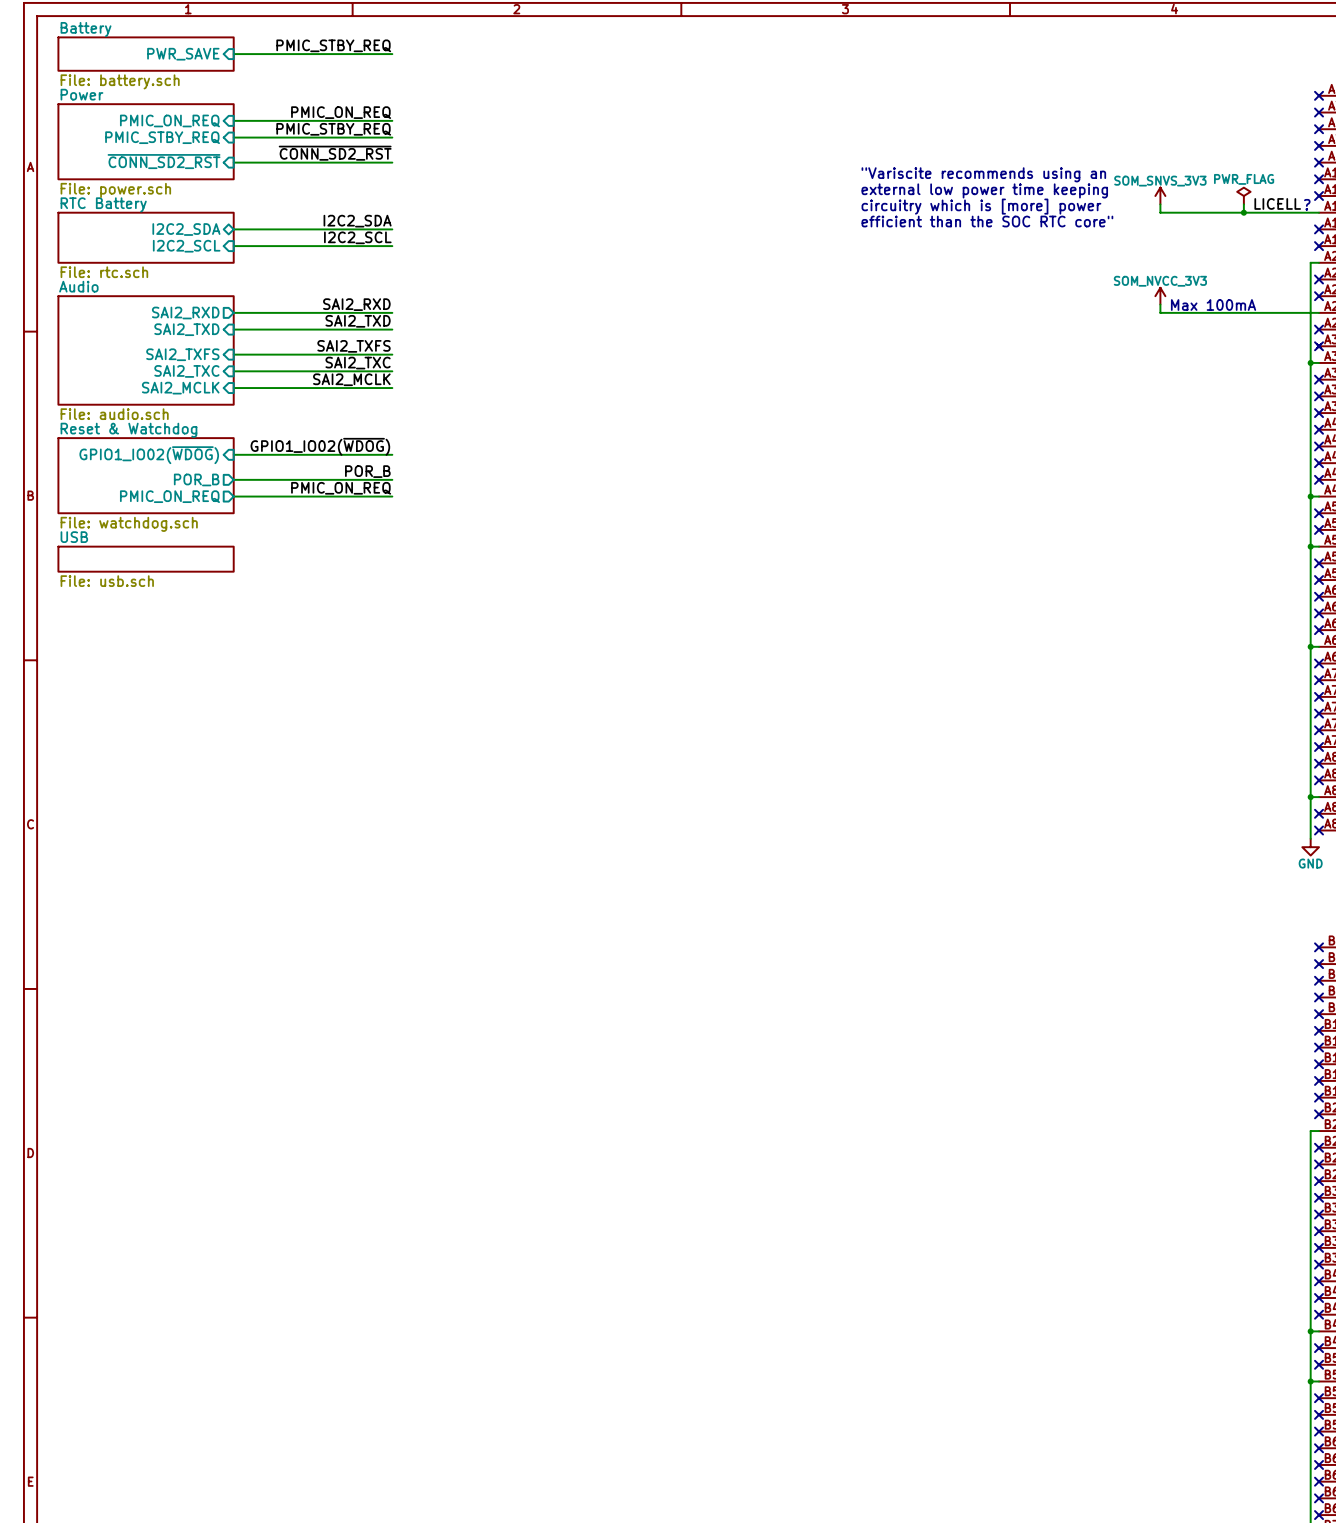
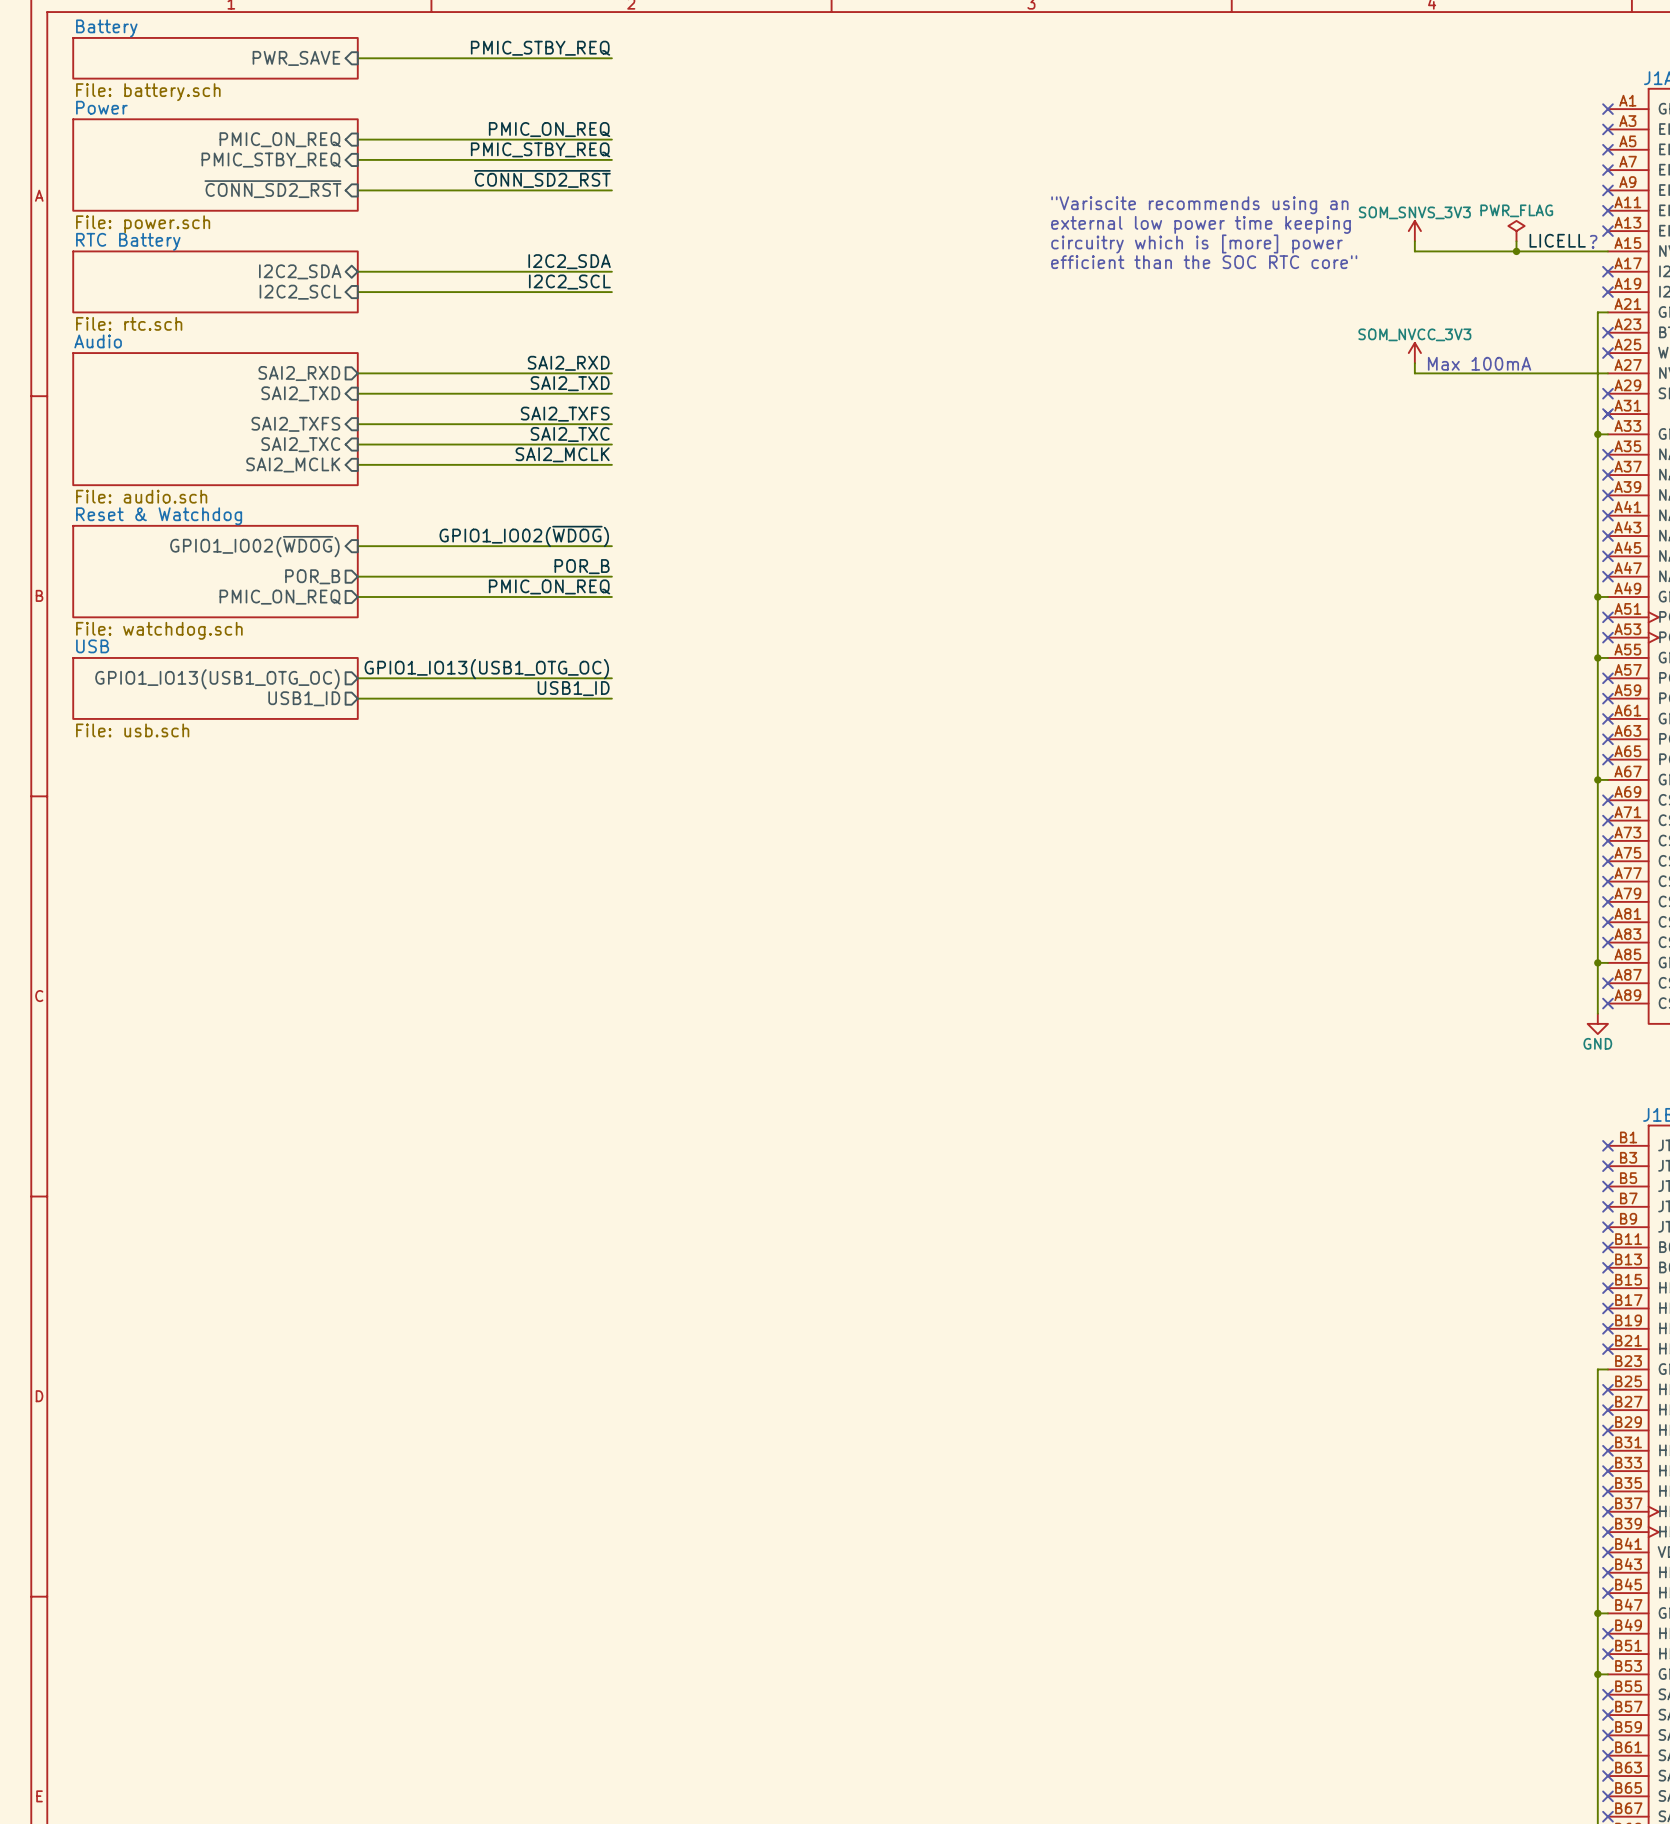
label position: PMIC_STBY_REQ (333, 45) -> PMIC_STBY_REQ (540, 48)
sheet Battery: File: battery.sch (146, 54) -> none
sheet Battery: none -> File: battery.sch (215, 58)
sheet pin position: PWR_SAVE (183, 54) -> PWR_SAVE (296, 58)
wire: (233, 54) (292, 54) -> none
wire: none -> (479, 58) (611, 58)
label position: PMIC_ON_REQ (341, 112) -> PMIC_ON_REQ (549, 129)
sheet pin position: PMIC_ON_REQ (169, 120) -> PMIC_ON_REQ (280, 139)
wire: (233, 120) (292, 120) -> none
wire: none -> (479, 139) (611, 139)
label position: PMIC_STBY_REQ (333, 129) -> PMIC_STBY_REQ (540, 149)
sheet pin position: PMIC_STBY_REQ (162, 137) -> PMIC_STBY_REQ (271, 160)
wire: (233, 137) (292, 137) -> none
wire: none -> (479, 159) (611, 159)
sheet Power: File: power.sch (146, 141) -> none
sheet Power: none -> File: power.sch (215, 165)
label position: ~{CONN_SD2_RST} (335, 153) -> ~{CONN_SD2_RST} (542, 178)
sheet pin position: ~{CONN_SD2_RST} (164, 161) -> ~{CONN_SD2_RST} (272, 189)
wire: (233, 162) (292, 162) -> none
wire: none -> (479, 190) (611, 190)
label position: I2C2_SDA (357, 221) -> I2C2_SDA (569, 261)
sheet pin position: I2C2_SDA (186, 229) -> I2C2_SDA (300, 271)
wire: (233, 229) (292, 229) -> none
wire: none -> (479, 271) (611, 271)
sheet RTC Battery: File: rtc.sch (146, 237) -> none
sheet RTC Battery: none -> File: rtc.sch (215, 281)
label position: I2C2_SCL (357, 237) -> I2C2_SCL (569, 282)
sheet pin position: I2C2_SCL (186, 246) -> I2C2_SCL (300, 292)
wire: (233, 246) (292, 246) -> none
wire: none -> (479, 292) (611, 292)
label position: SAI2_RXD (356, 304) -> SAI2_RXD (568, 363)
sheet pin position: SAI2_RXD (185, 312) -> SAI2_RXD (299, 373)
wire: (233, 312) (292, 312) -> none
wire: none -> (479, 373) (611, 373)
label position: SAI2_TXD (358, 321) -> SAI2_TXD (570, 383)
sheet pin position: SAI2_TXD (186, 329) -> SAI2_TXD (300, 393)
wire: (233, 329) (292, 329) -> none
wire: none -> (479, 393) (611, 393)
label position: SAI2_TXFS (354, 346) -> SAI2_TXFS (565, 414)
sheet Audio: File: audio.sch (146, 350) -> none
sheet Audio: none -> File: audio.sch (215, 419)
sheet pin position: SAI2_TXFS (182, 354) -> SAI2_TXFS (295, 424)
wire: (233, 354) (292, 354) -> none
wire: none -> (479, 424) (611, 424)
label position: SAI2_TXC (358, 363) -> SAI2_TXC (570, 434)
sheet pin position: SAI2_TXC (186, 371) -> SAI2_TXC (300, 444)
wire: (233, 371) (292, 371) -> none
wire: none -> (479, 444) (611, 444)
label position: SAI2_MCLK (351, 379) -> SAI2_MCLK (562, 454)
sheet pin position: SAI2_MCLK (180, 388) -> SAI2_MCLK (293, 464)
wire: (233, 388) (292, 388) -> none
wire: none -> (479, 464) (611, 464)
label position: GPIO1_IO02(~{WDOG}) (320, 446) -> GPIO1_IO02(~{WDOG}) (524, 536)
wire: (233, 454) (292, 454) -> none
wire: none -> (479, 546) (611, 546)
sheet pin position: GPIO1_IO02(~{WDOG}) (149, 455) -> GPIO1_IO02(~{WDOG}) (254, 546)
label position: POR_B (367, 471) -> POR_B (582, 566)
sheet Reset & Watchdog: File: watchdog.sch (146, 475) -> none
sheet Reset & Watchdog: none -> File: watchdog.sch (215, 571)
sheet pin position: POR_B (196, 479) -> POR_B (312, 576)
wire: (233, 479) (292, 479) -> none
wire: none -> (479, 576) (611, 576)
label position: PMIC_ON_REQ (341, 488) -> PMIC_ON_REQ (549, 586)
sheet pin position: PMIC_ON_REQ (169, 496) -> PMIC_ON_REQ (280, 597)
wire: (233, 496) (292, 496) -> none
wire: none -> (479, 596) (611, 596)
label: none -> GPIO1_IO13(USB1_OTG_OC) (486, 669)
sheet USB: File: usb.sch (146, 559) -> none
wire: none -> (357, 678) (611, 678)
sheet pin: none -> GPIO1_IO13(USB1_OTG_OC) (217, 679)
sheet USB: none -> File: usb.sch (215, 688)
label: none -> USB1_ID (573, 688)
sheet pin: none -> USB1_ID (304, 698)
wire: none -> (357, 698) (611, 698)

